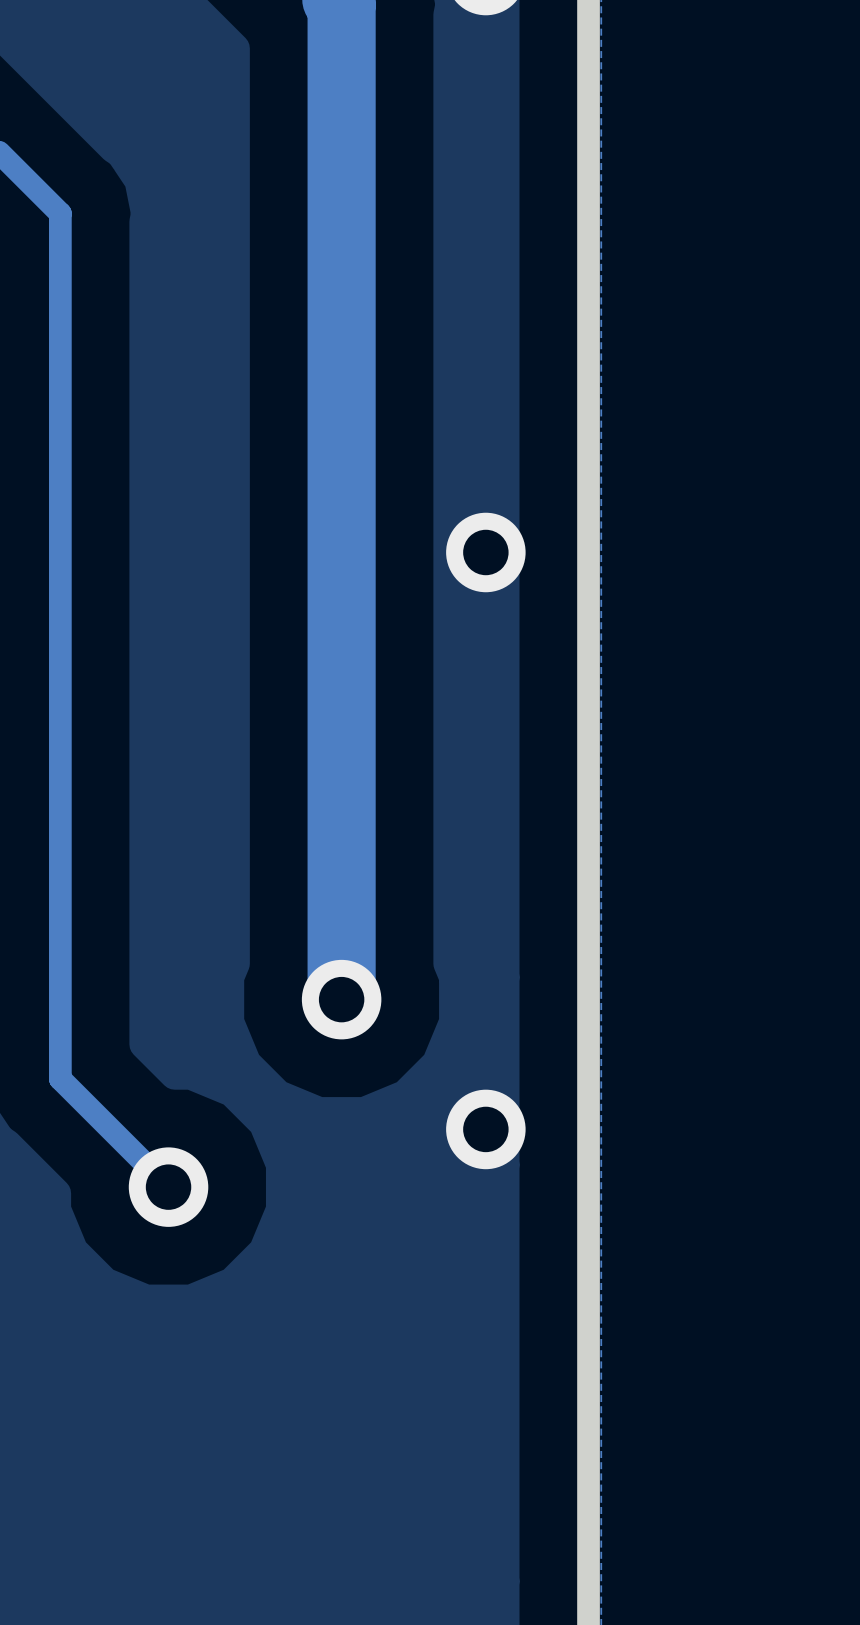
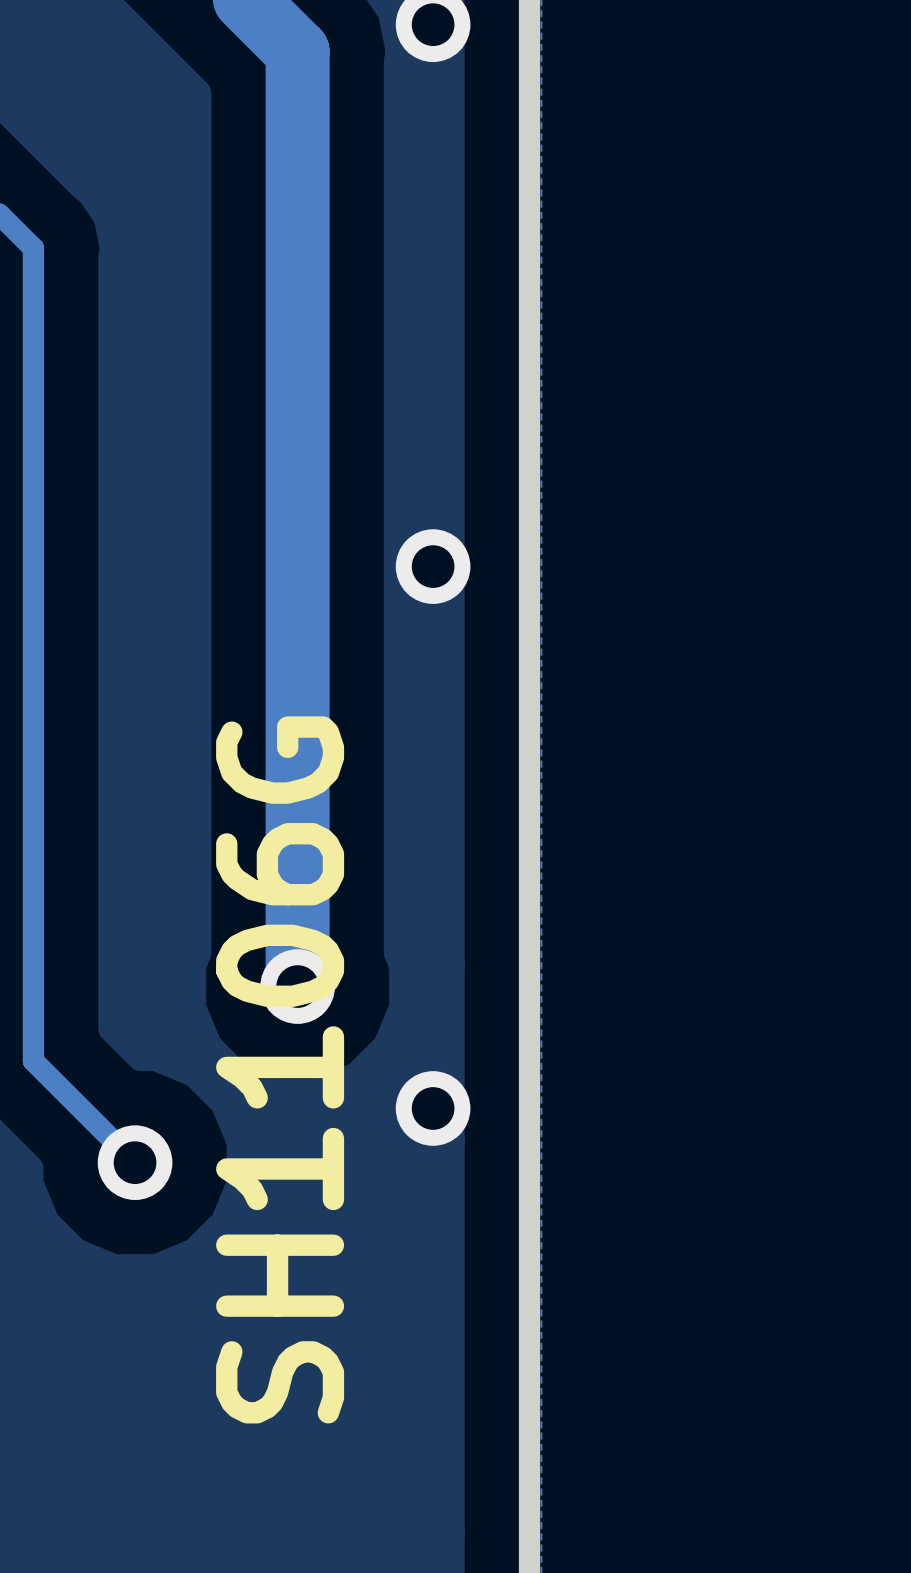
text: none -> SH1106G (280, 1069)

